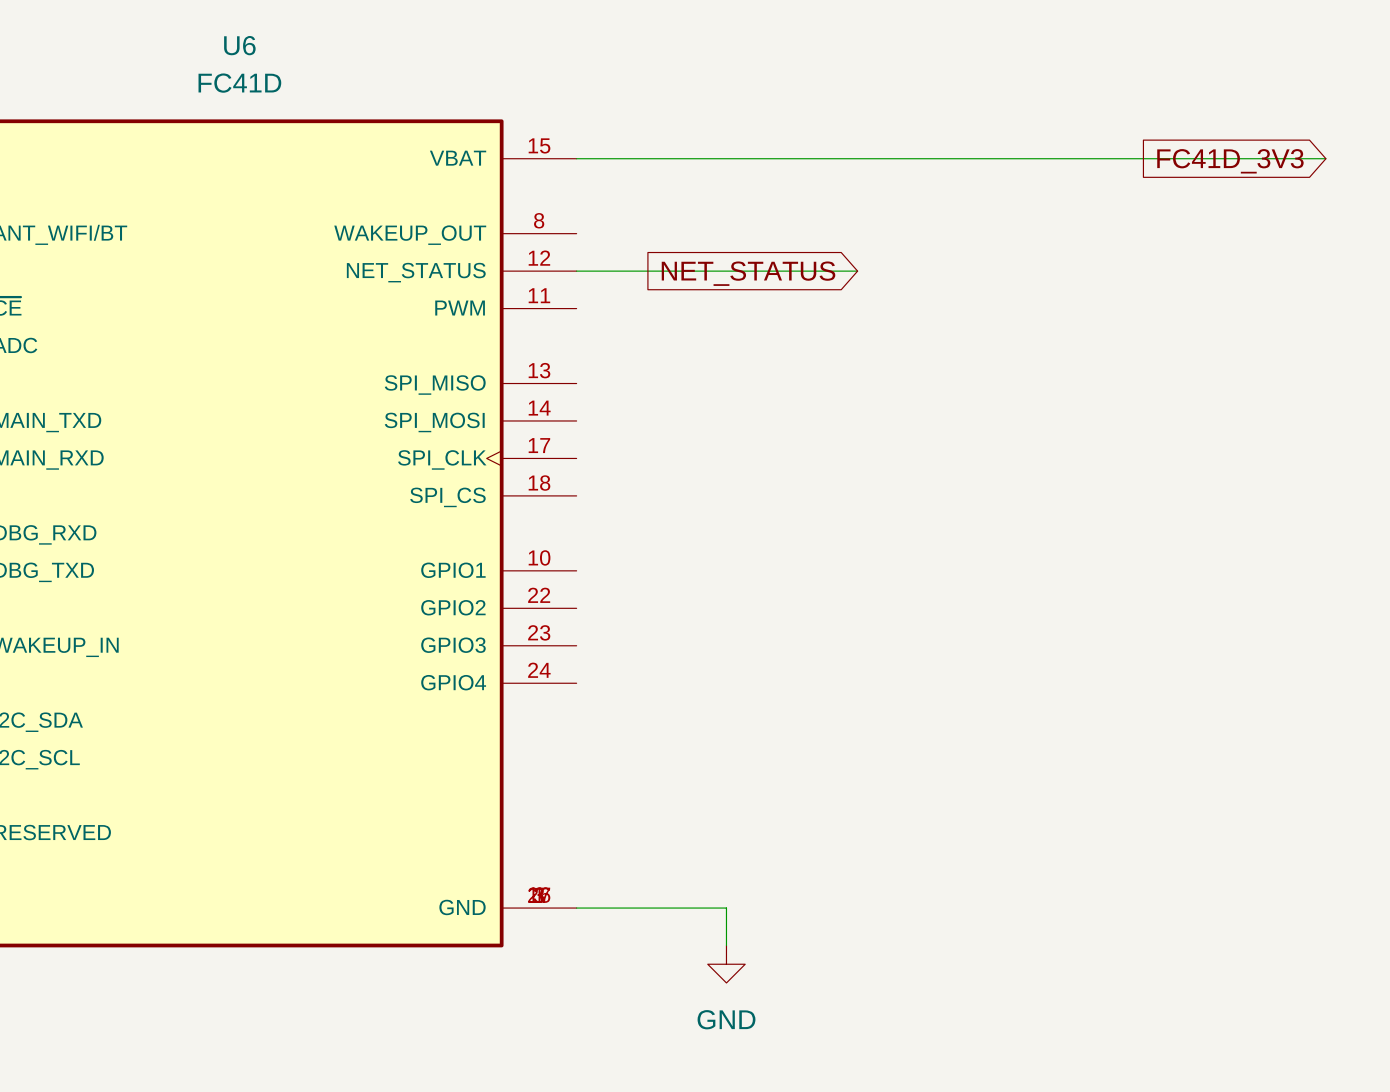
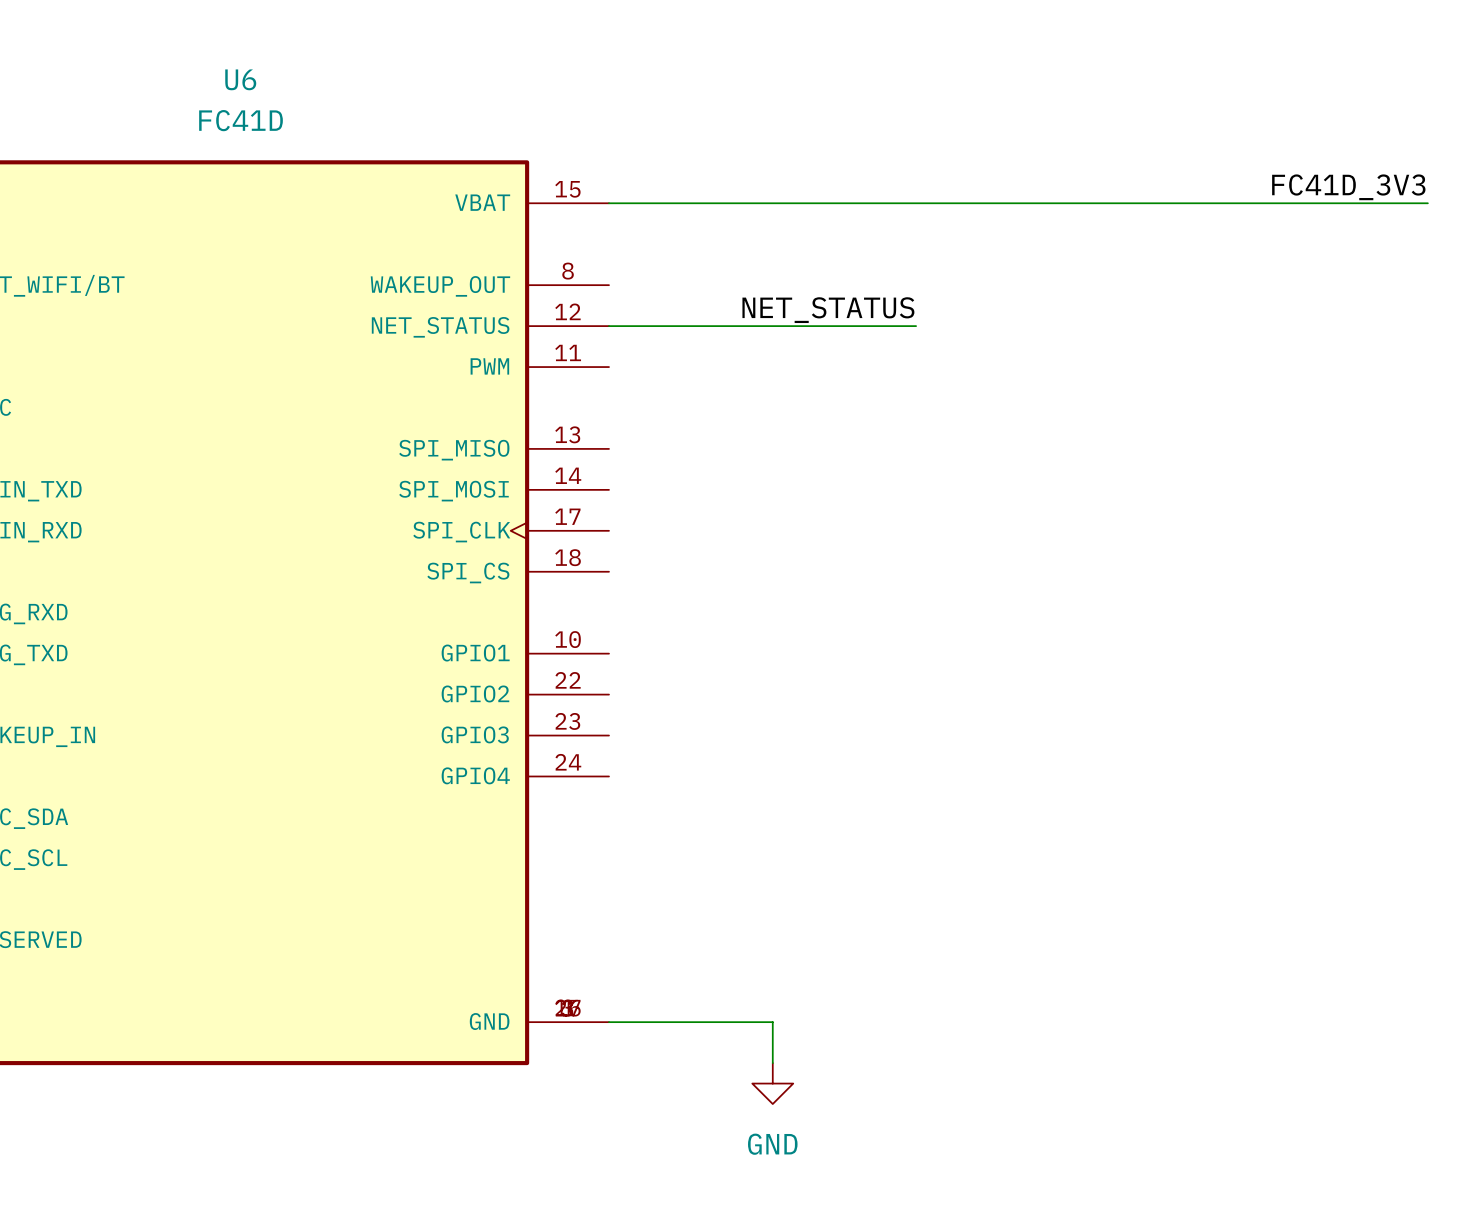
label: none -> FC41D_3V3 (1348, 187)
global label: FC41D_3V3 (1230, 161) -> none
label: none -> NET_STATUS (828, 310)
global label: NET_STATUS (748, 273) -> none

